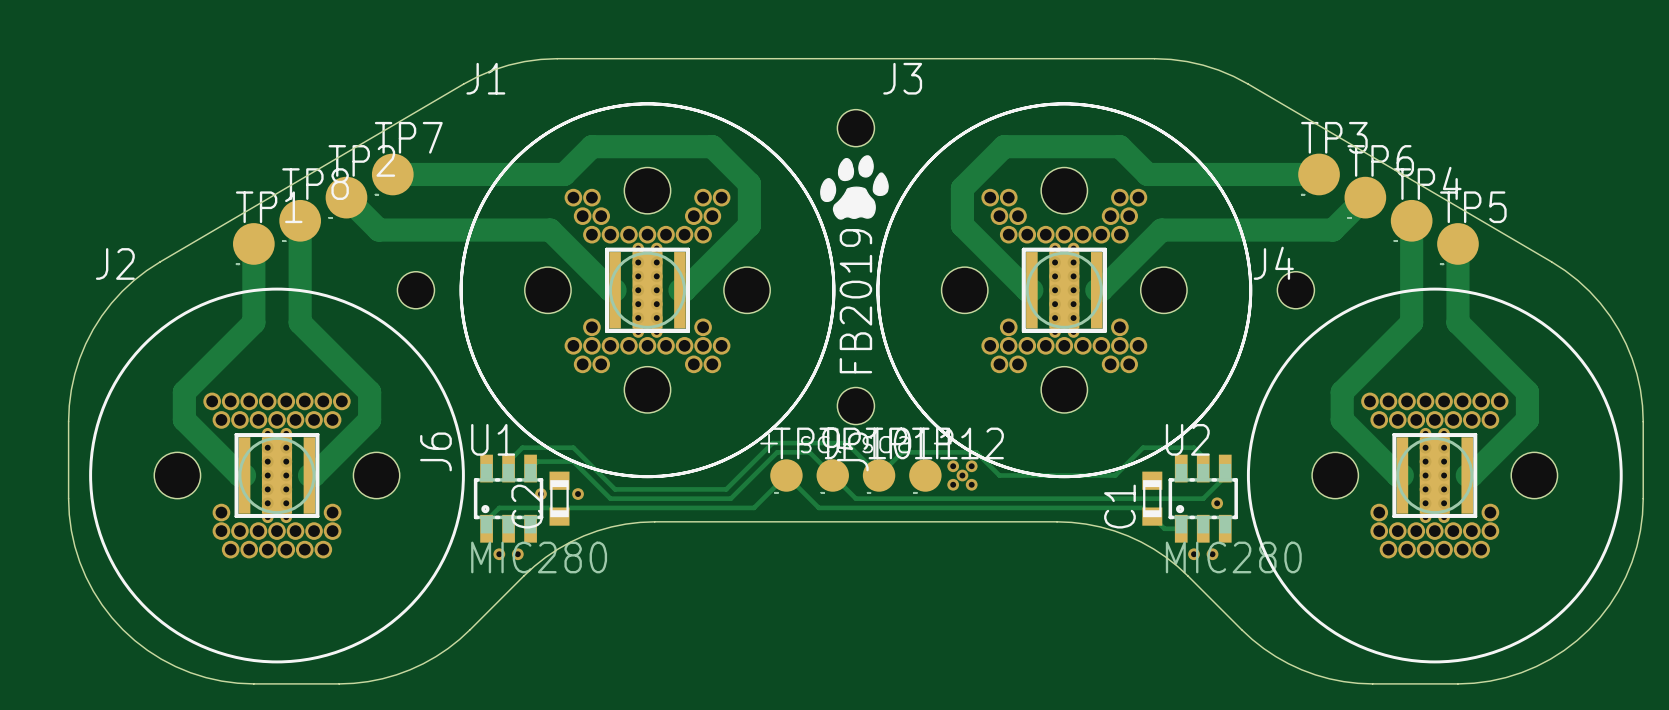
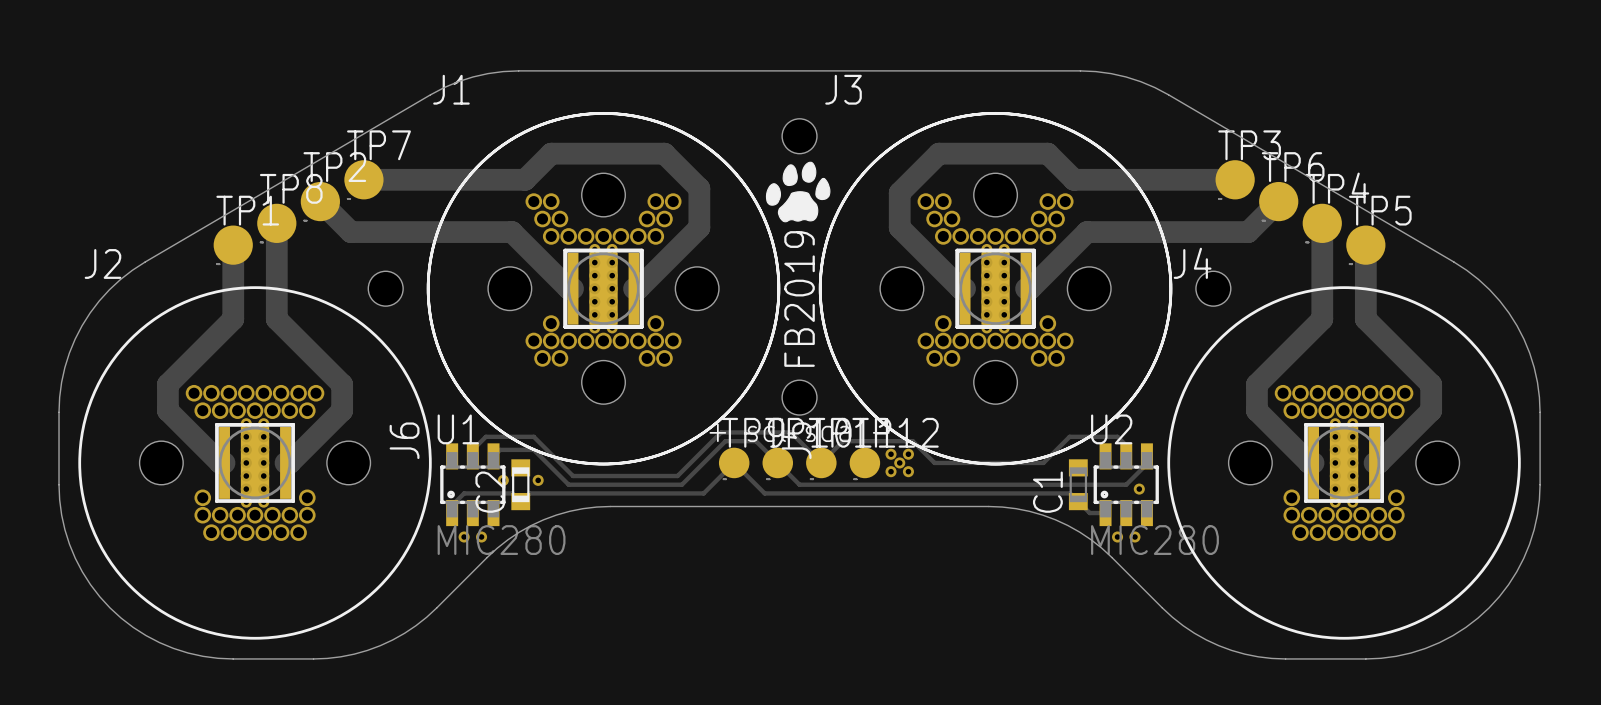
C1 footprint: [1142, 471, 1163, 526] -> [1068, 459, 1088, 511]

